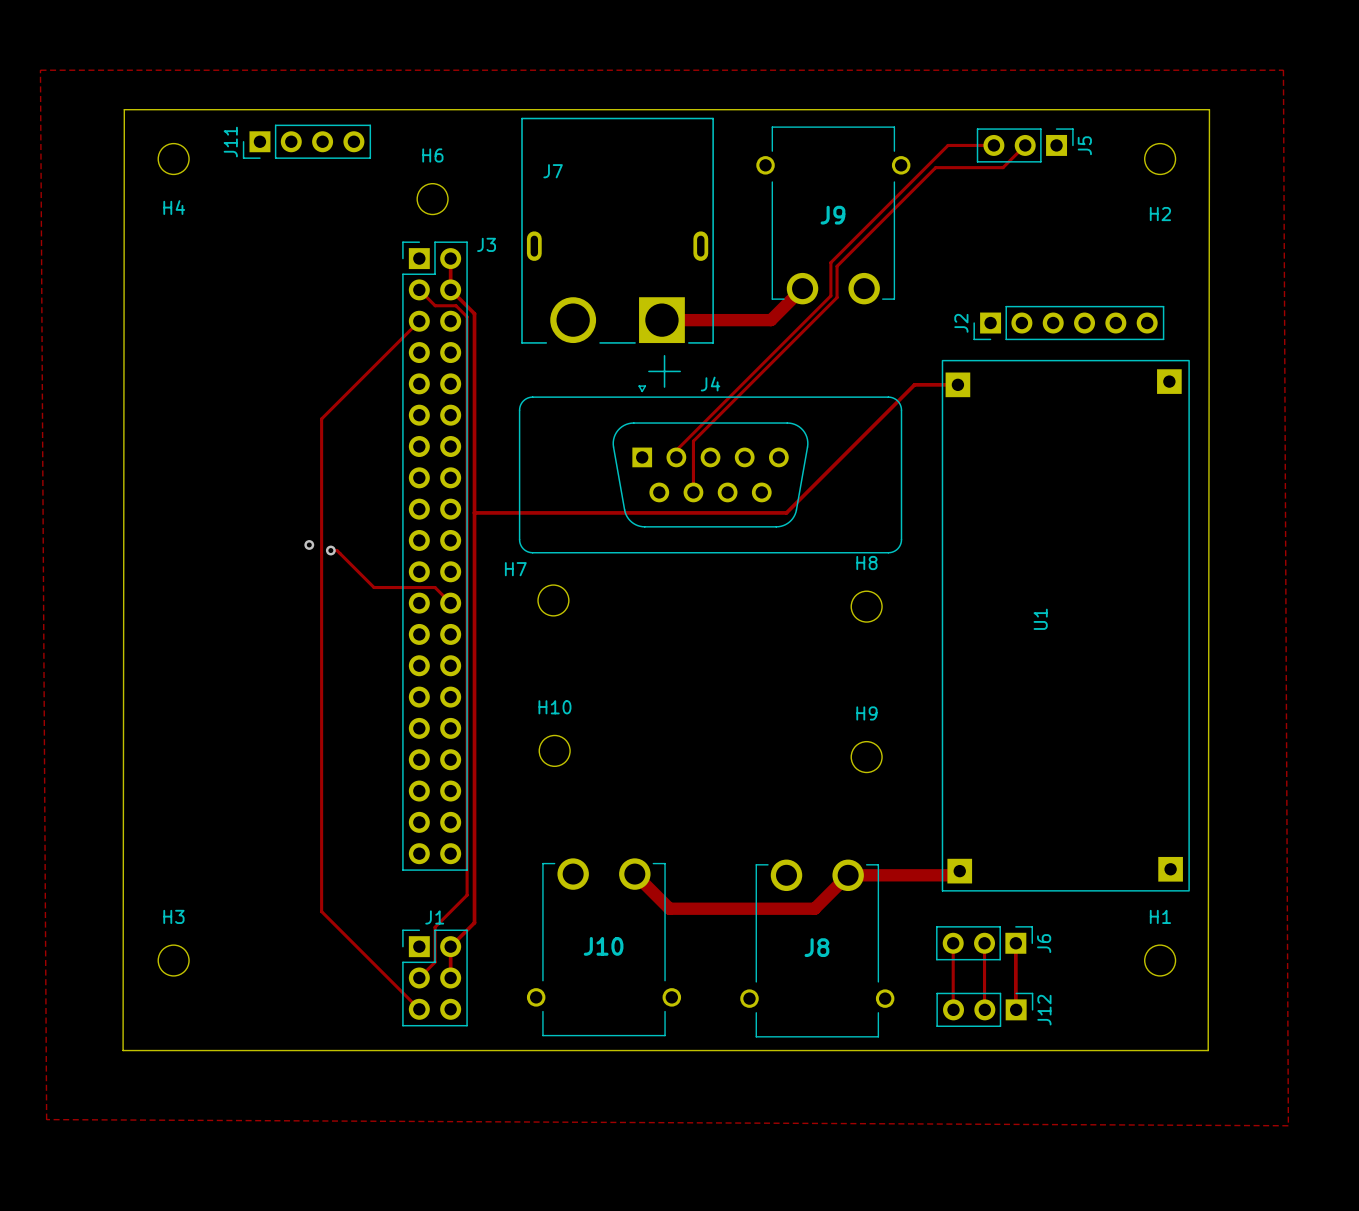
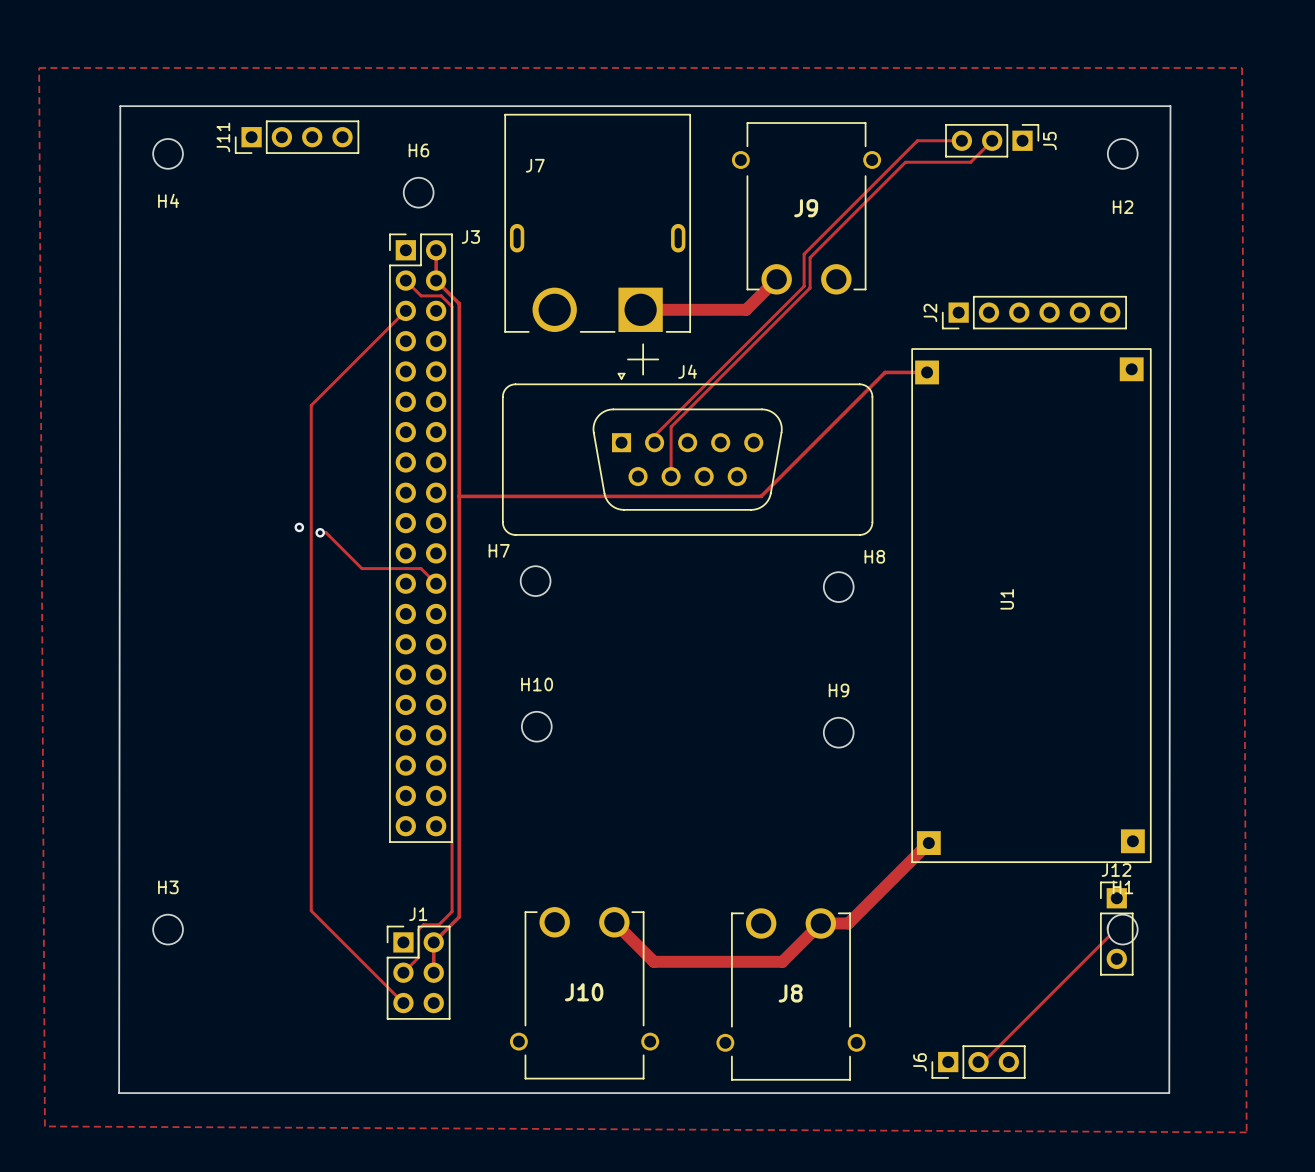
zone outline: (40, 70) (46, 1119) (1288, 1125) (1283, 70) -> (39, 67) (44, 1126) (1246, 1132) (1242, 67)
board edge: (124, 109) (123, 1050) (1208, 1050) (1209, 109) -> (120, 106) (119, 1093) (1169, 1093) (1170, 106)
H8 name position: H8 (866, 563) -> H8 (874, 556)
track: (634, 874) (669, 908) (814, 908) (848, 875) (955, 875) -> (614, 922) (653, 961) (782, 961) (820, 923) (848, 923) (924, 847)
track: (467, 895) (435, 927) (435, 962) (419, 977) -> (452, 866) (452, 911) (438, 924) (423, 924) (418, 929) (418, 957) (403, 972)
track: (321, 911) (419, 1009) -> (311, 882) (311, 910) (403, 1003)
track: (474, 922) (450, 946) (450, 977) -> (459, 893) (459, 916) (433, 942) (433, 972)
track: (953, 943) (953, 1009) -> none
track: (984, 943) (984, 1009) -> none
J6 rotation: 0° (984, 943) -> 180° (978, 1062)
J6 position: (984, 943) -> (978, 1062)
track: (1015, 943) (1016, 1009) -> none
J10 position: (603, 947) -> (584, 993)
J8 position: (817, 948) -> (790, 994)
track: none -> (1116, 928) (983, 1062) (978, 1062)
J1 position: (435, 977) -> (418, 972)
J12 rotation: 0° (984, 1009) -> 90° counterclockwise (1116, 928)
J12 position: (984, 1009) -> (1116, 928)

